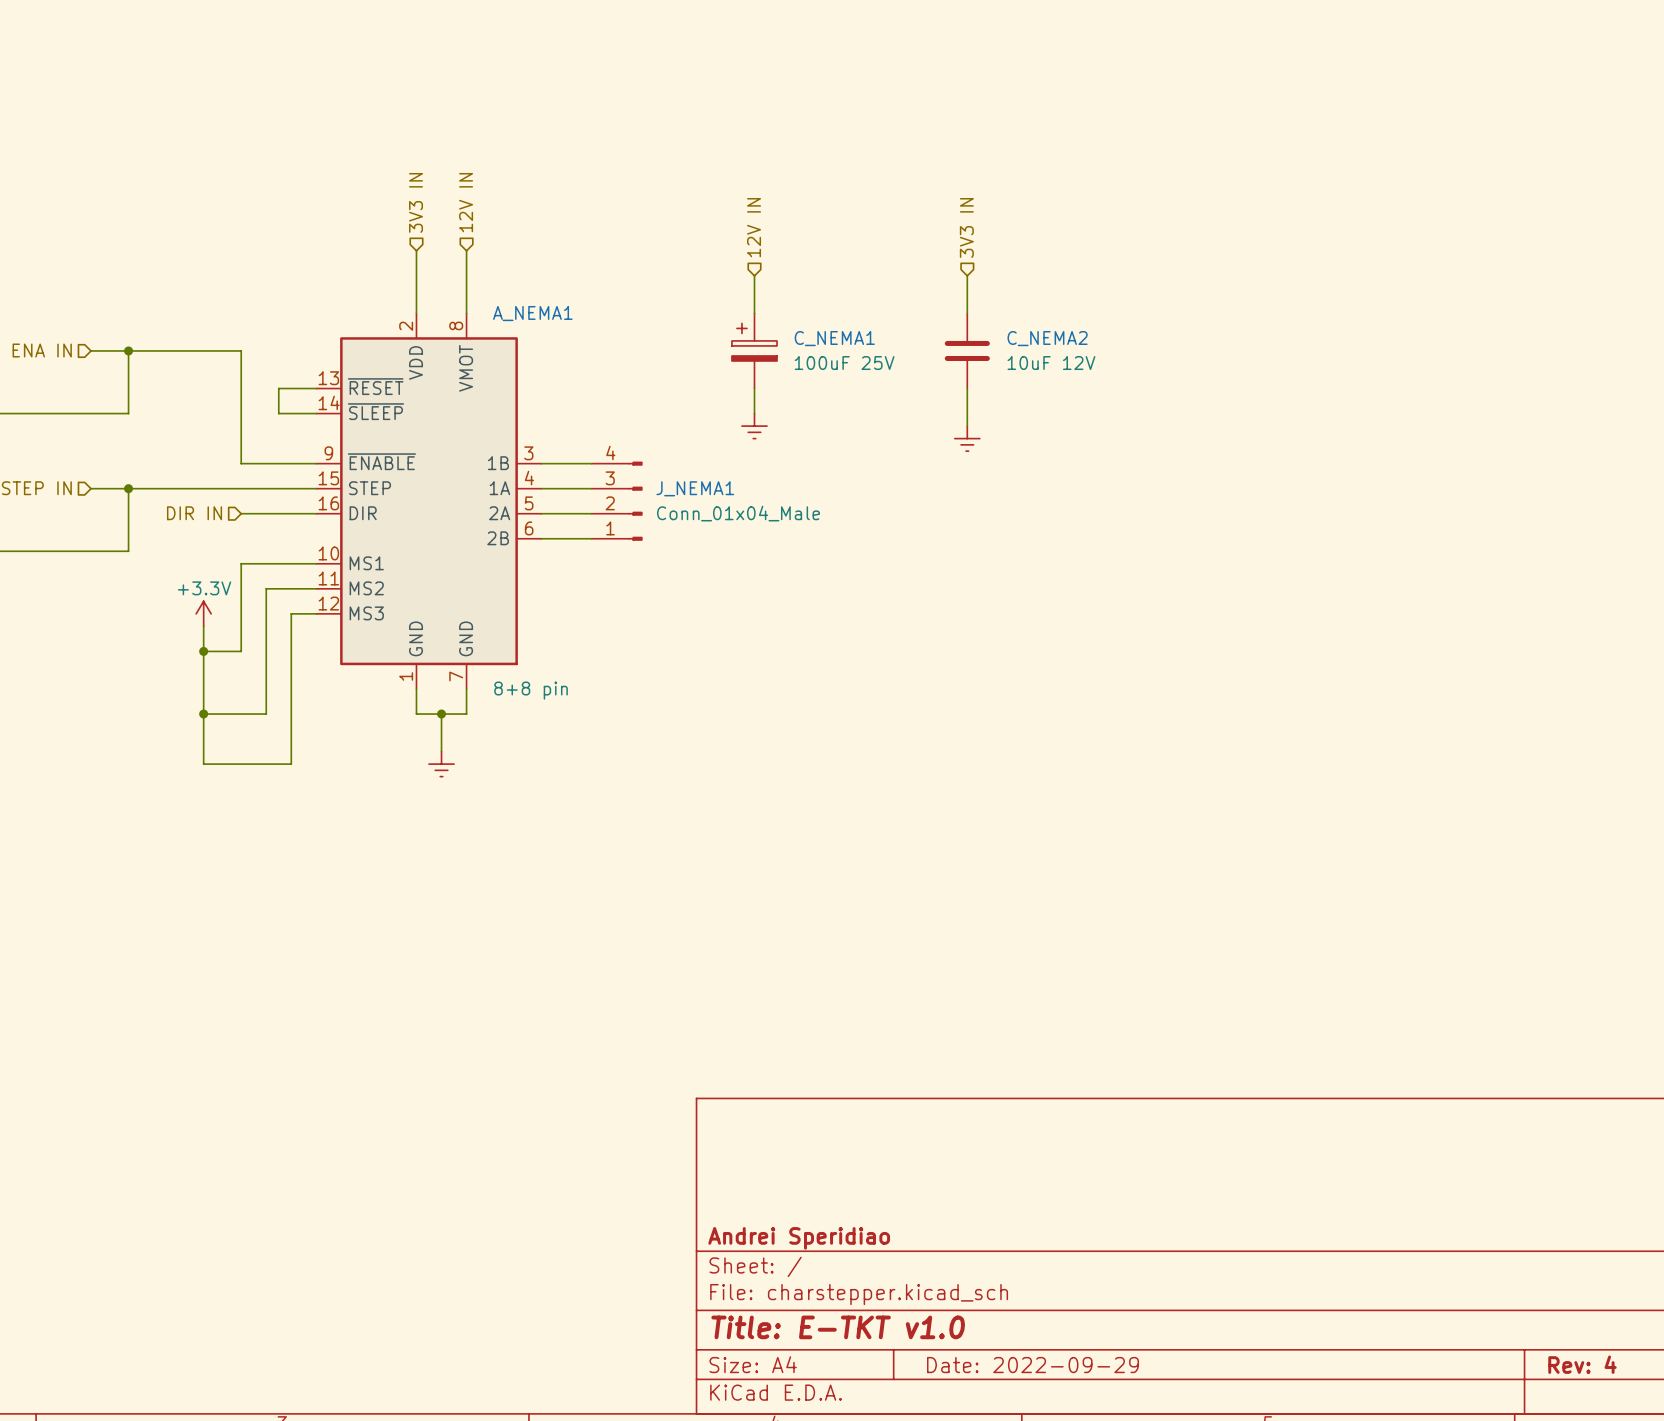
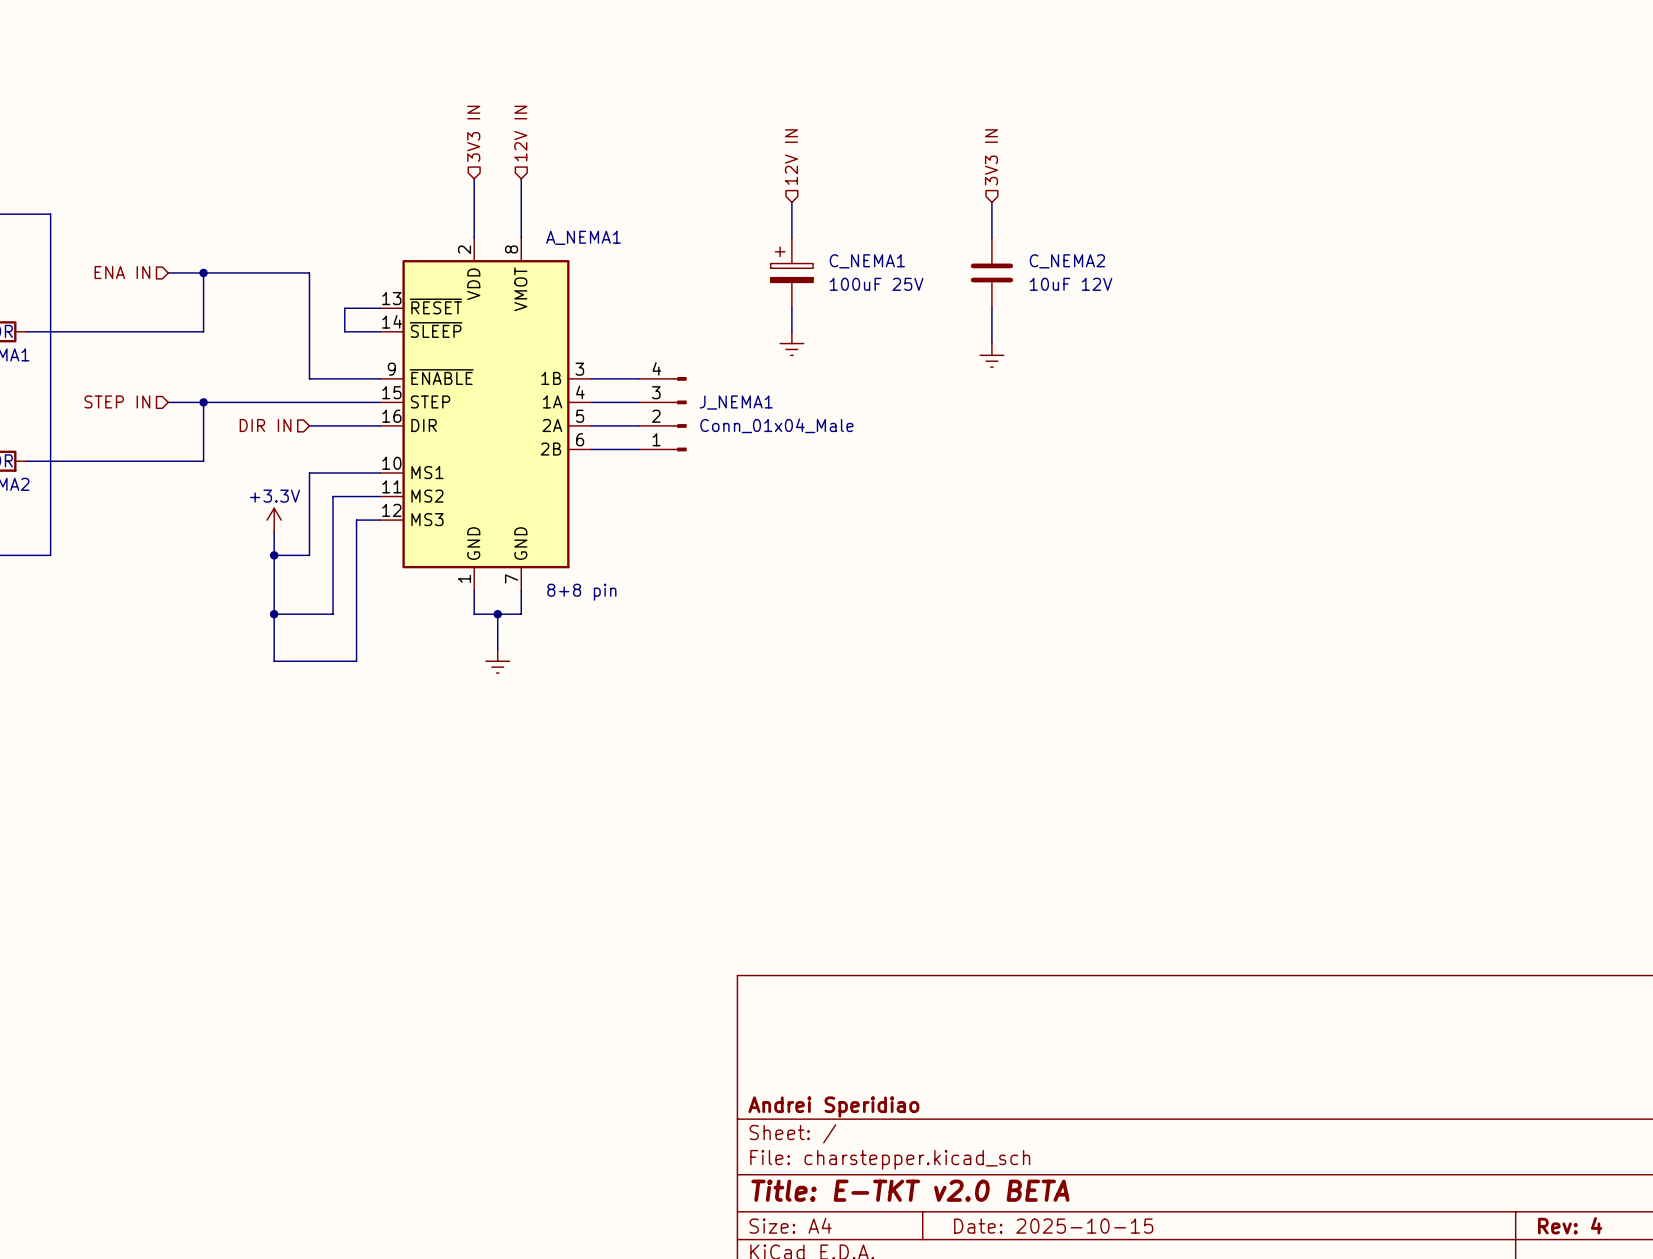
title block: Title: E-TKT v1.0 (838, 1327) -> Title: E-TKT v2.0 BETA (910, 1190)
title block: Date: 2022-09-29 (1033, 1365) -> Date: 2025-10-15 (1053, 1226)

